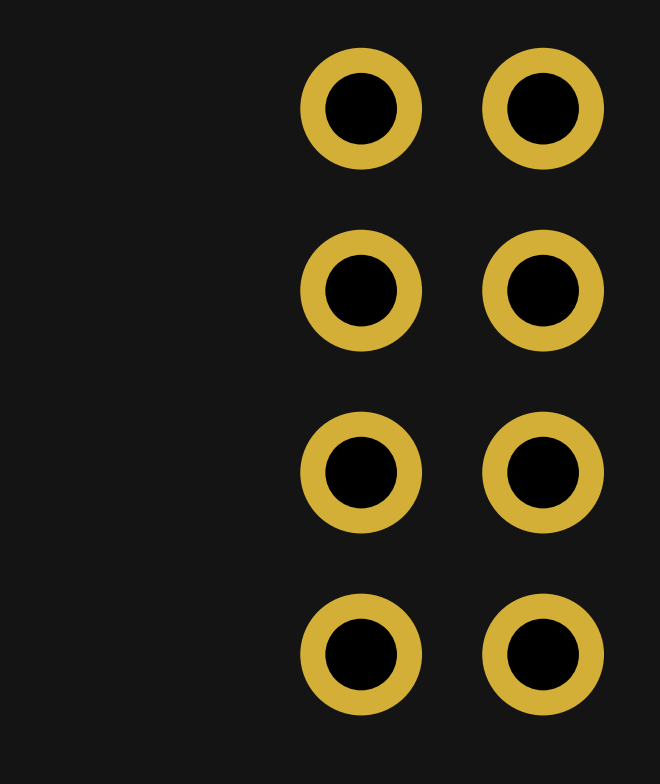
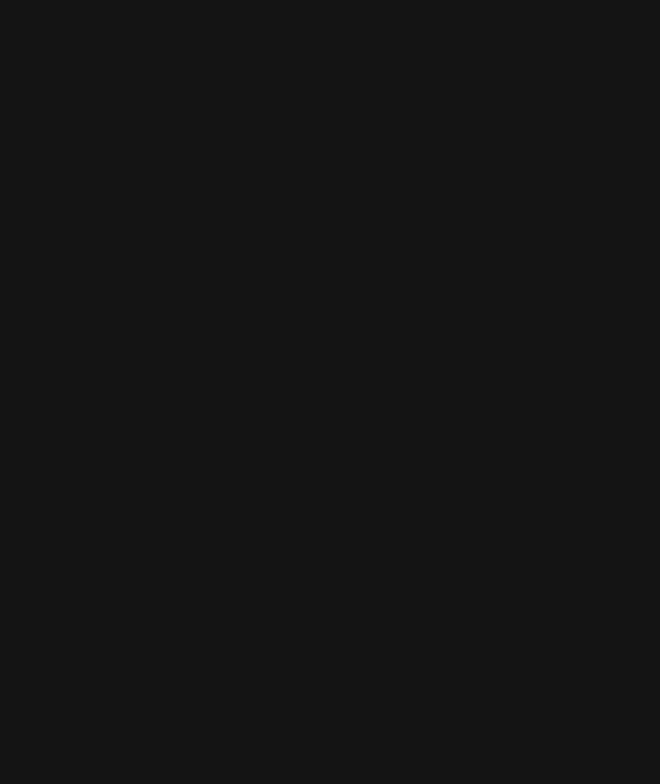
part: (452, 381) -> none

